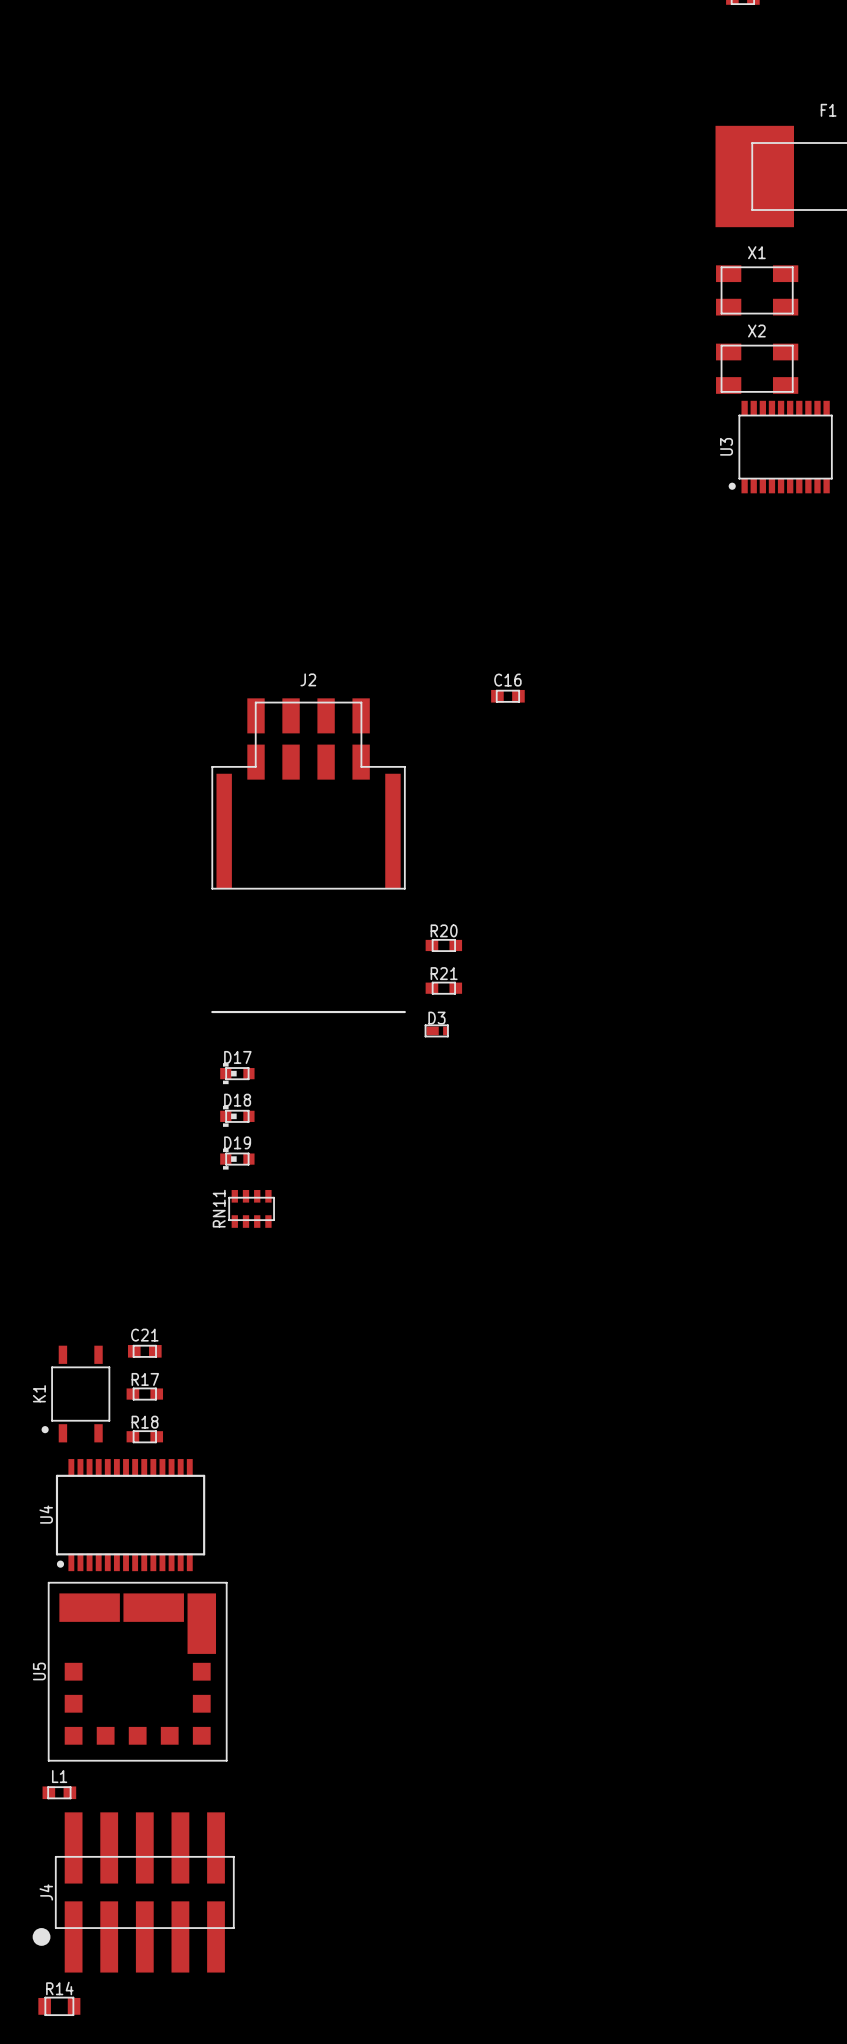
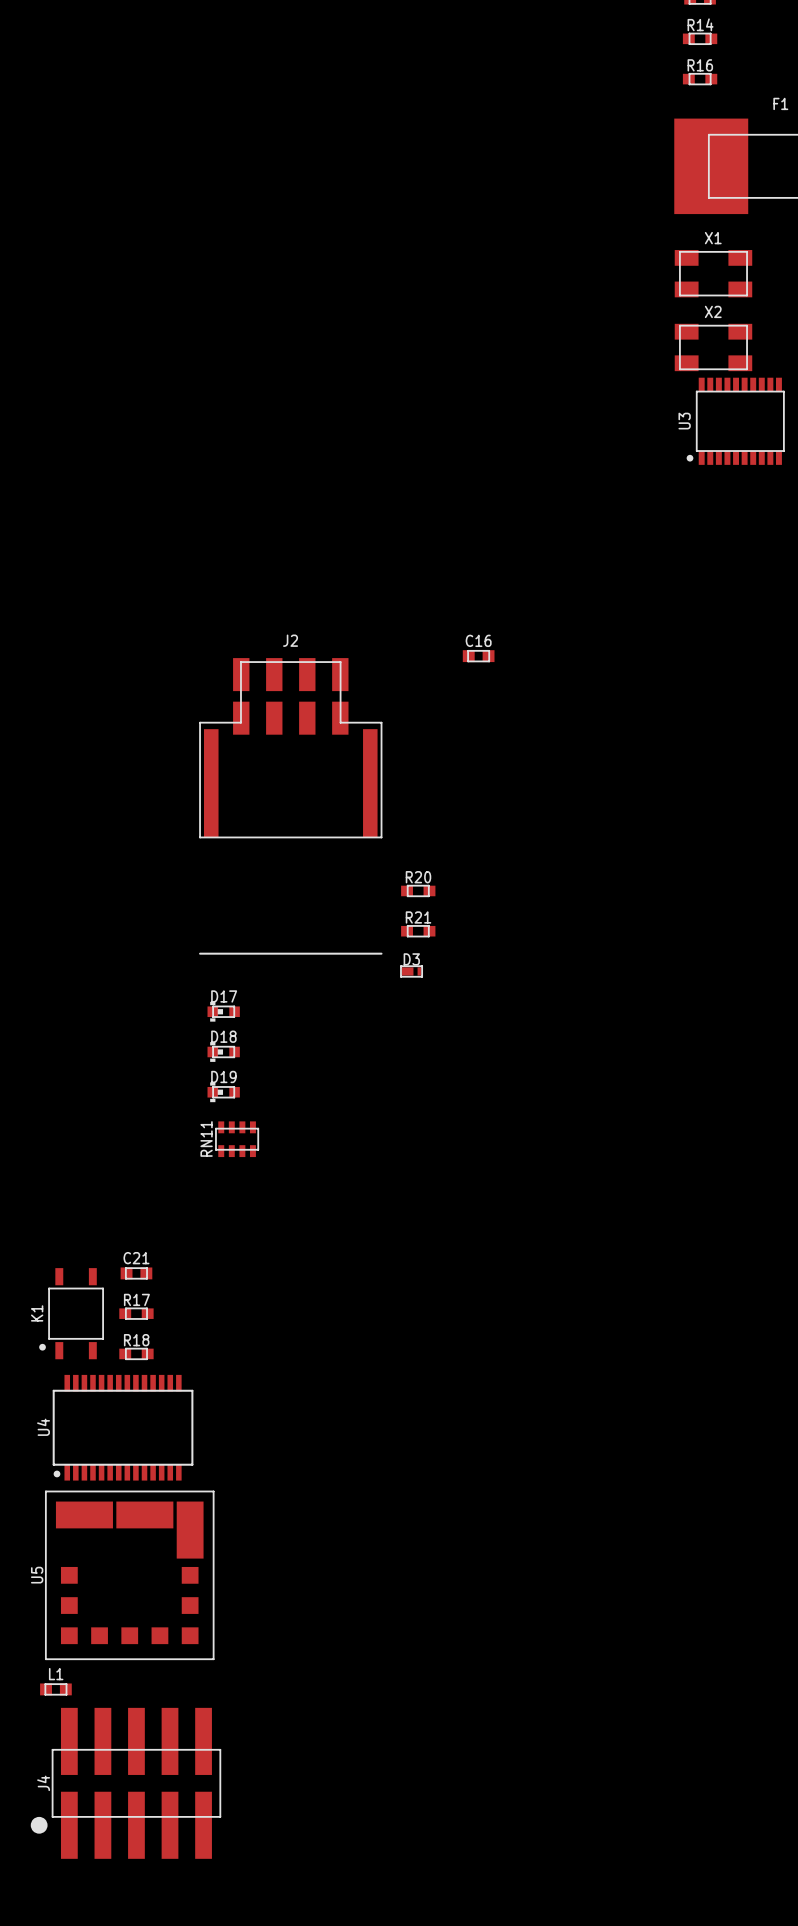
R16: none -> (700, 79)
R14 footprint: [38, 1996, 81, 2017] -> [682, 32, 718, 45]

